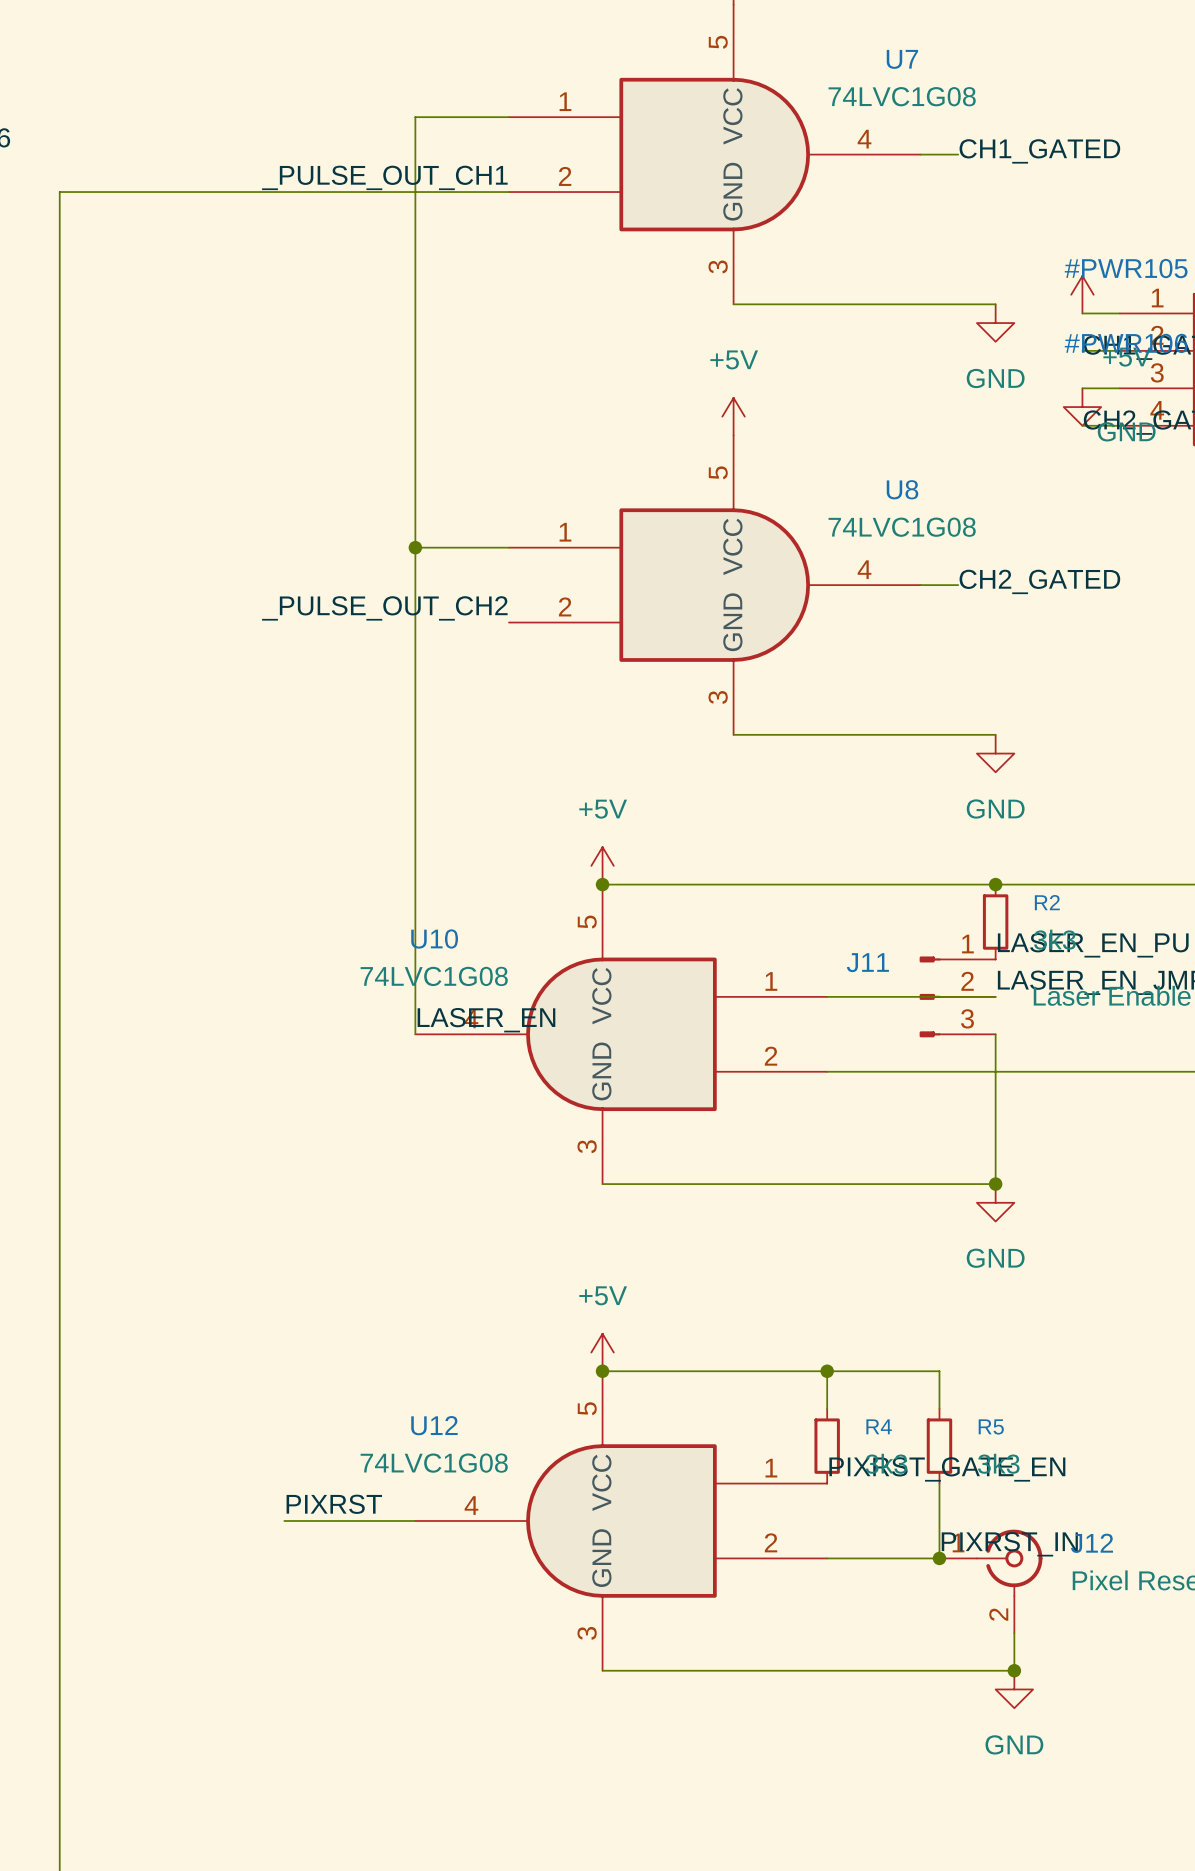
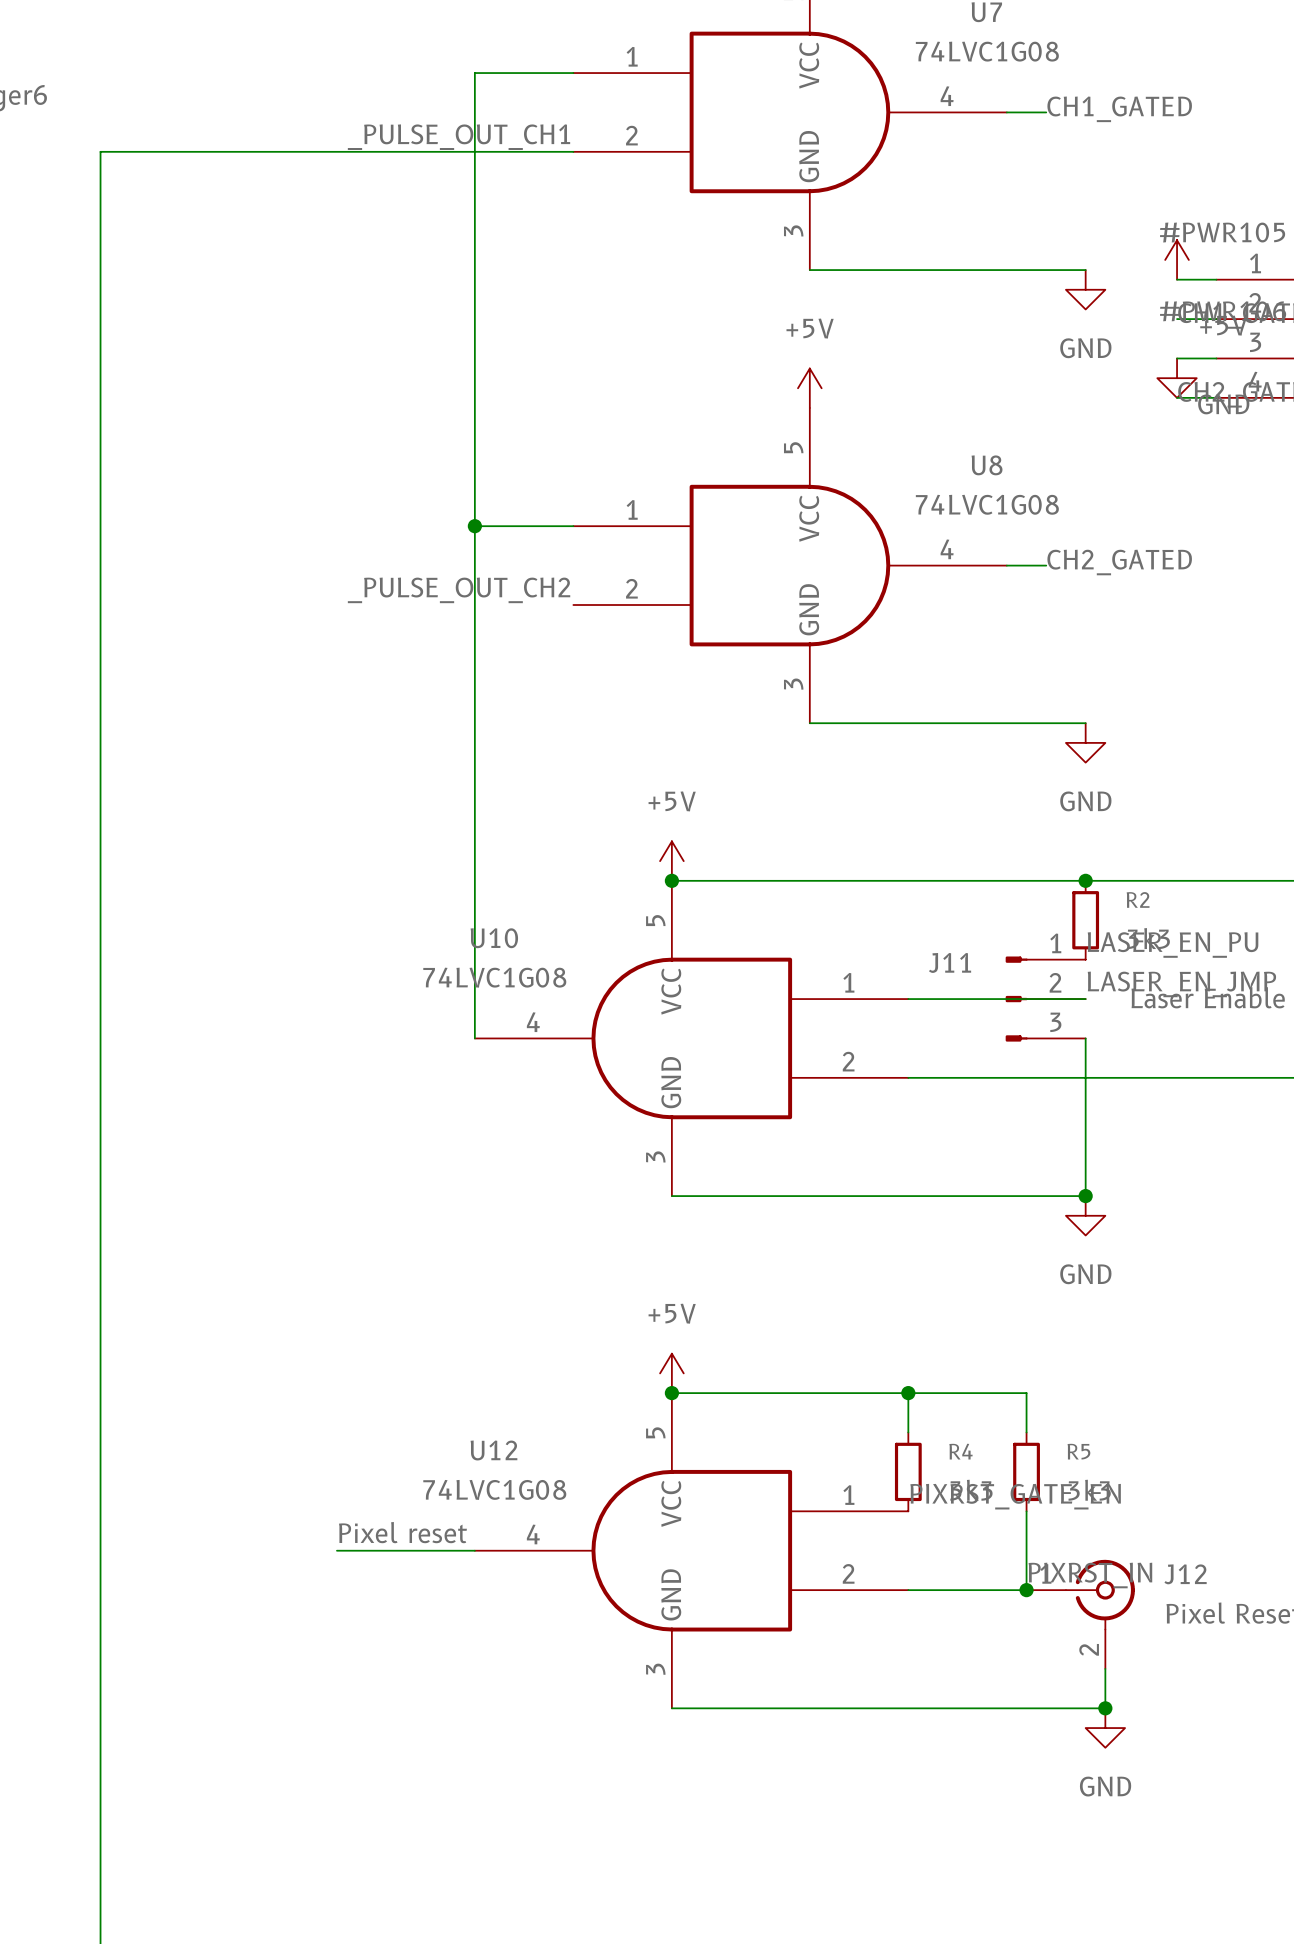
label: LASER_EN (486, 1020) -> none
label: PIXRST (334, 1504) -> Pixel reset (402, 1532)

